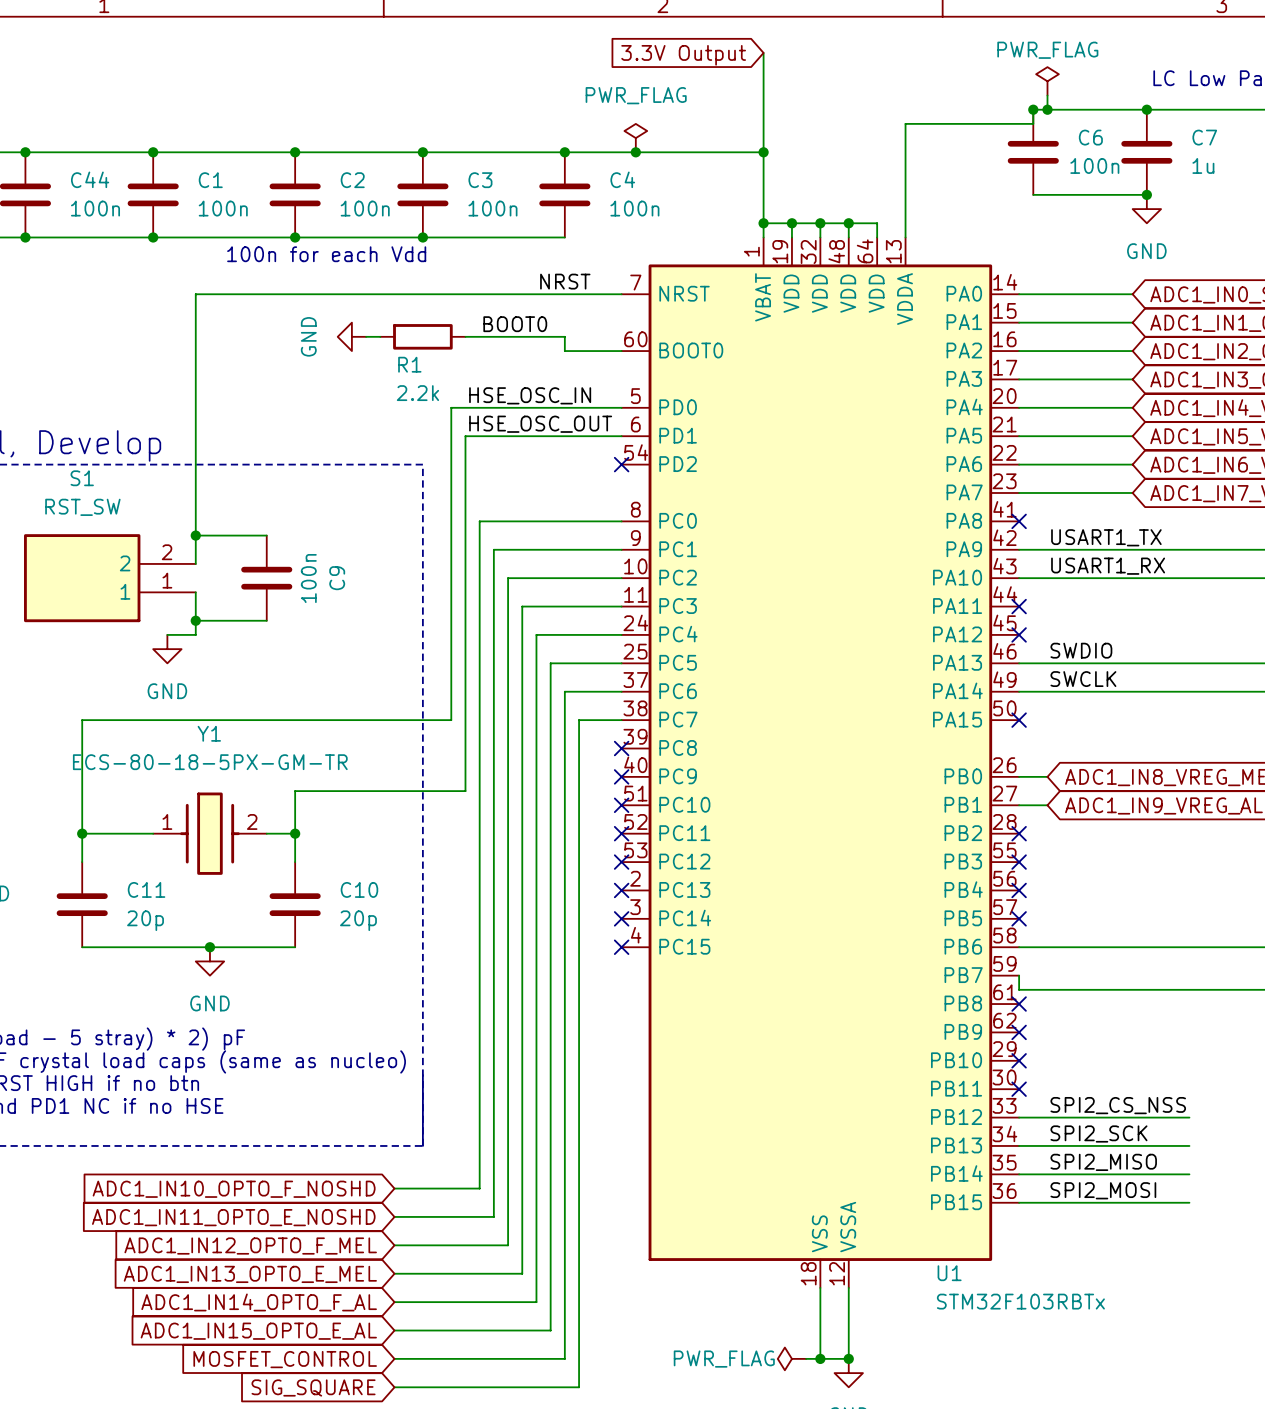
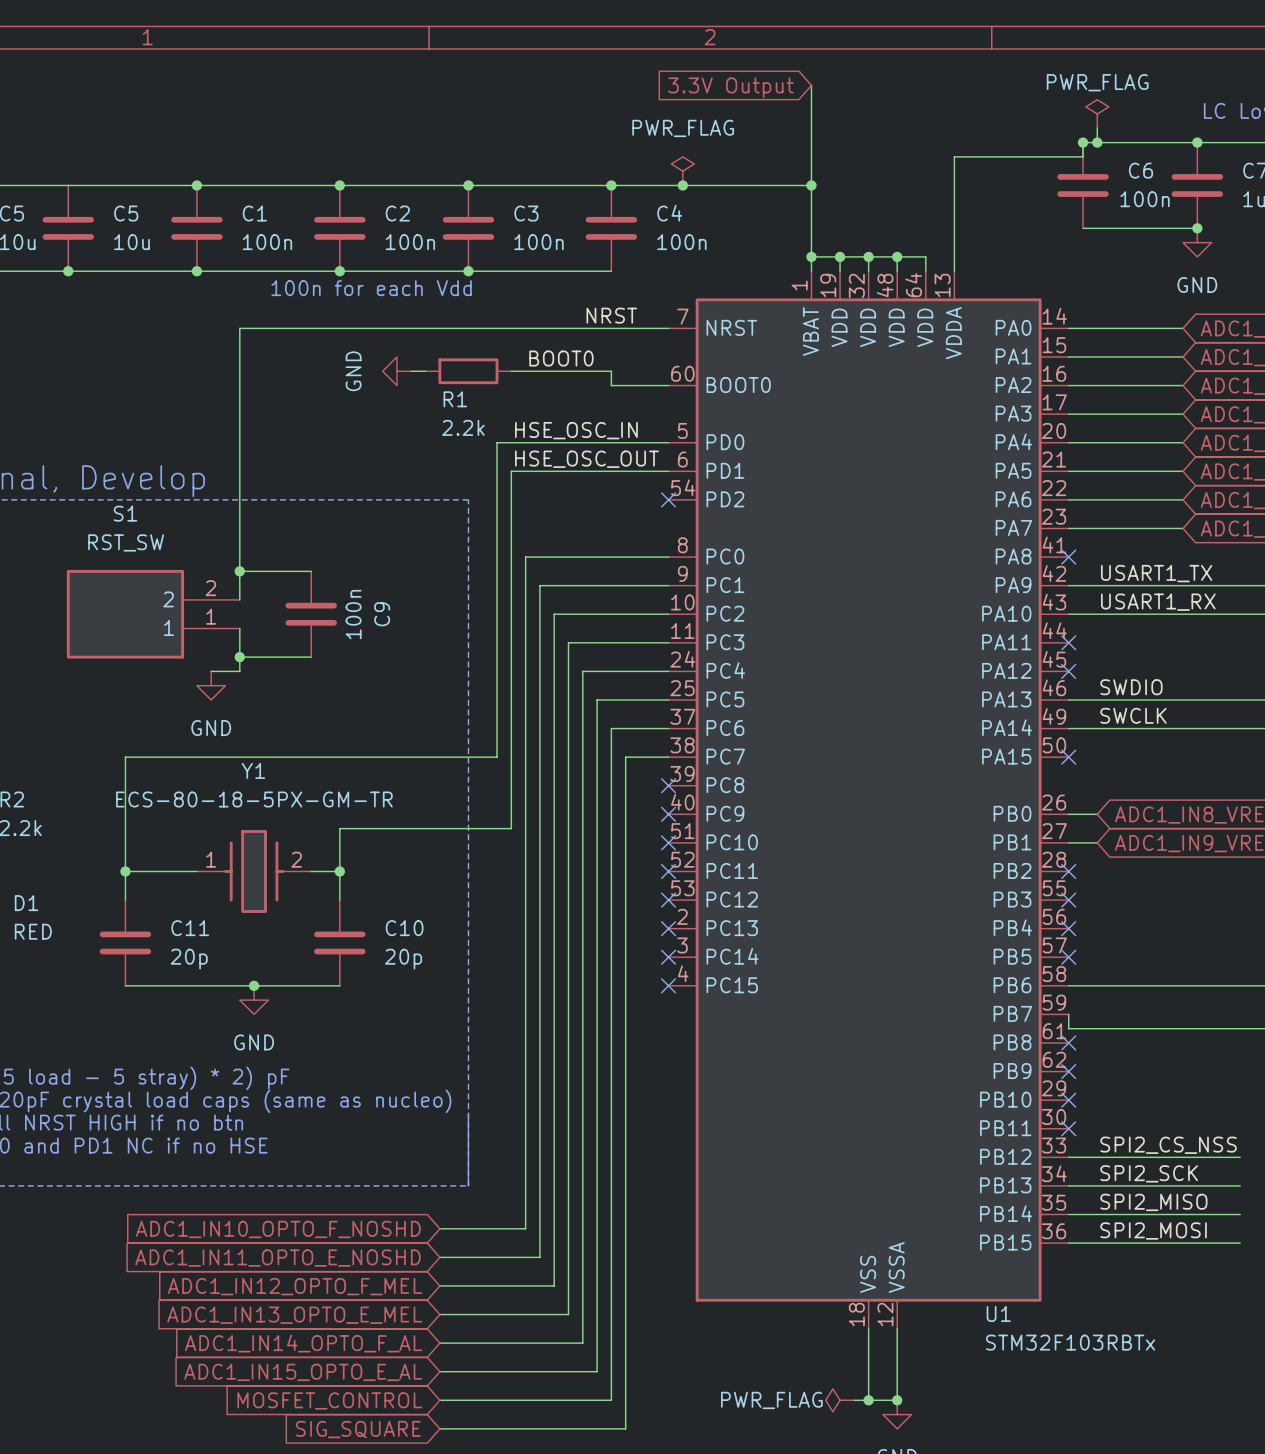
junction: (25, 152) -> none
C44 name: C44 (90, 179) -> C5 (126, 213)
C44 value: 100n (95, 208) -> 10u (132, 242)

